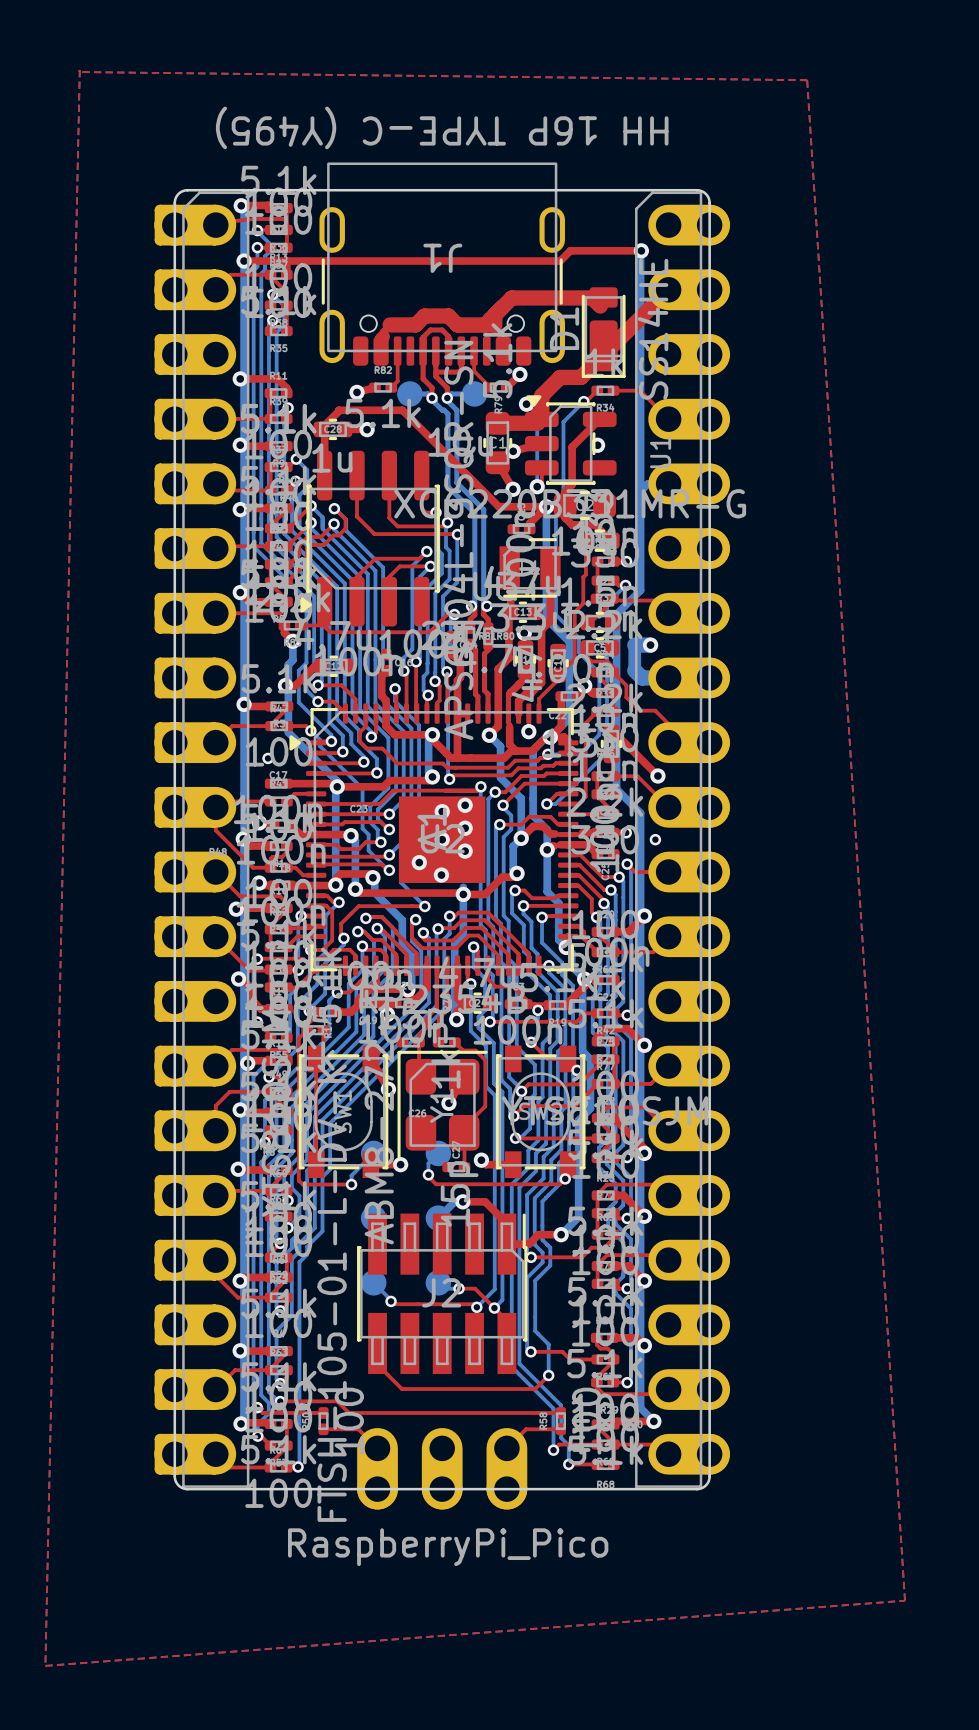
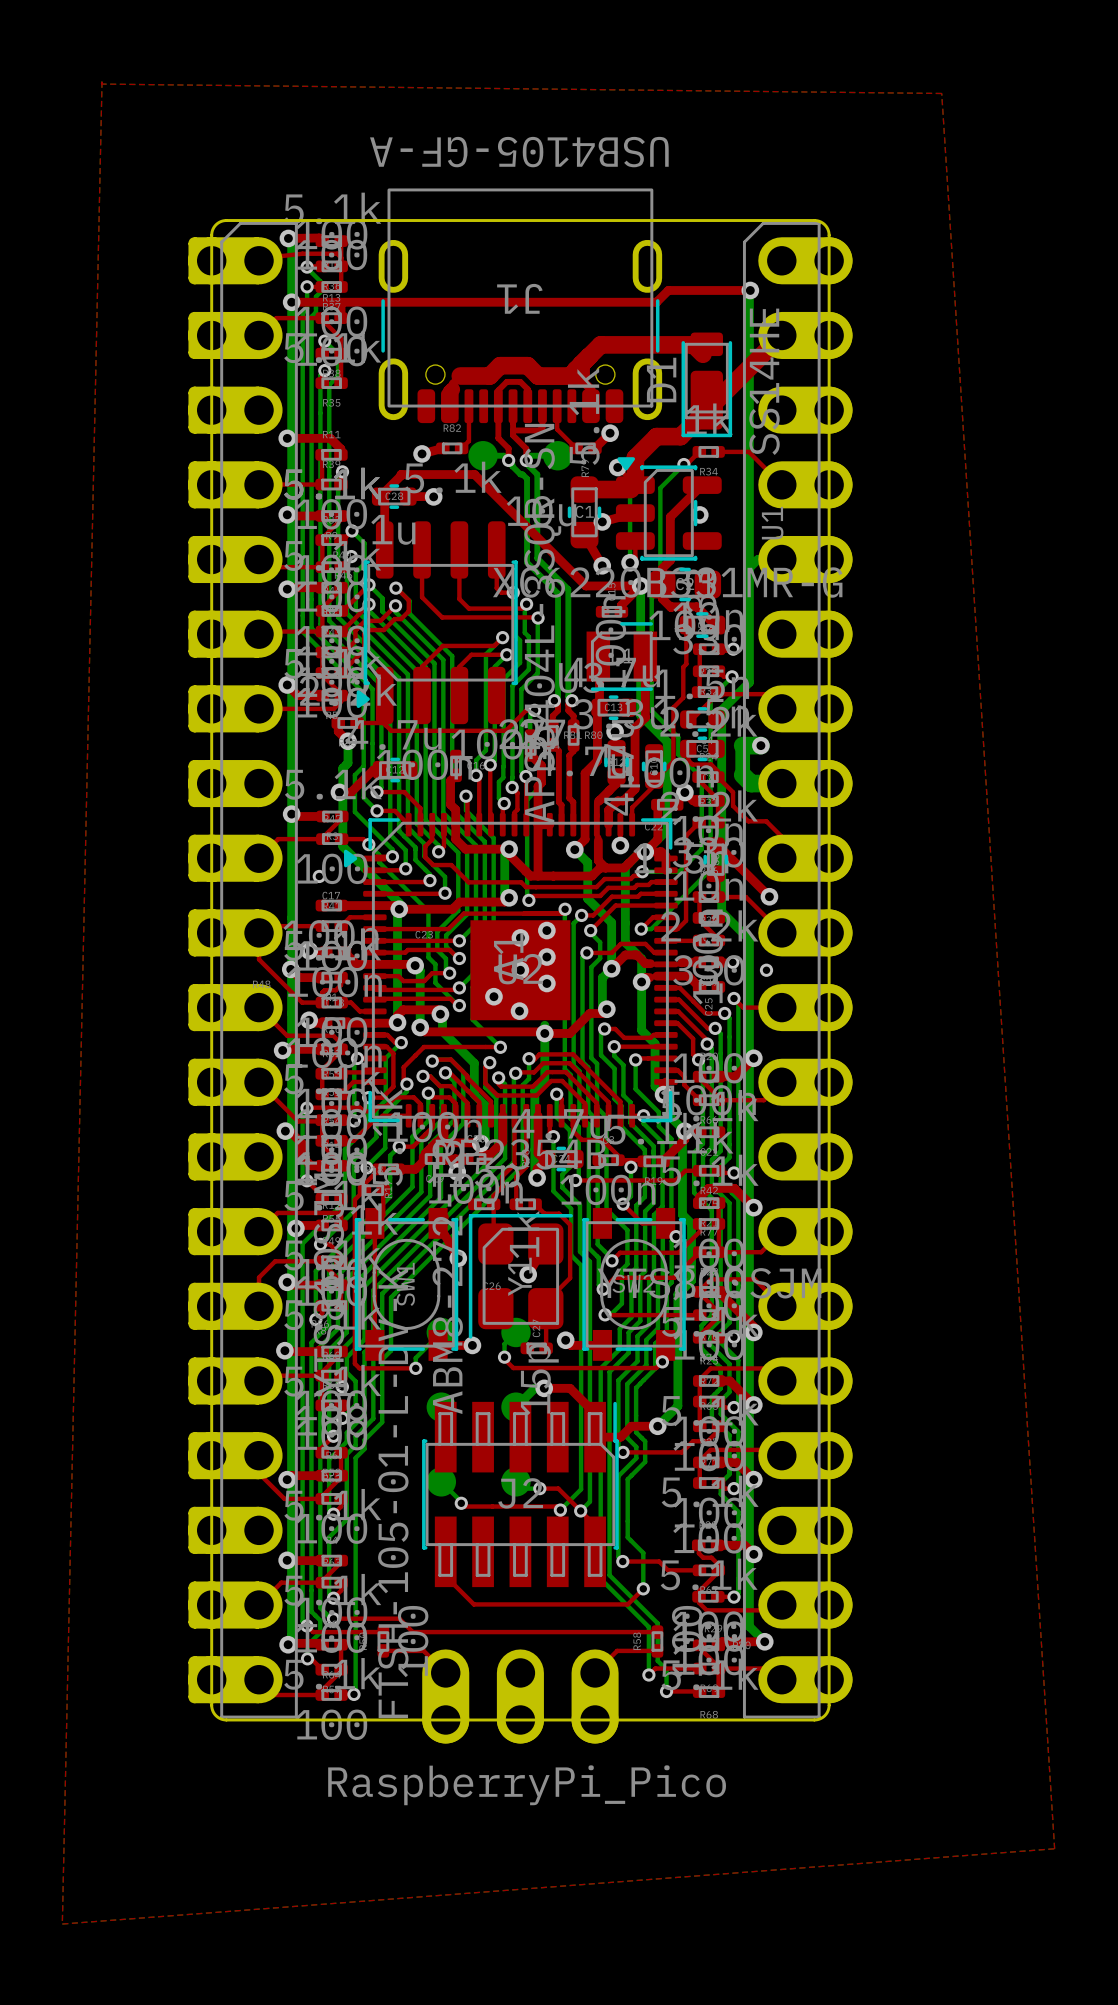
J1 value: HH 16P TYPE-C (Y495) (442, 127) -> USB4105-GF-A (519, 152)

